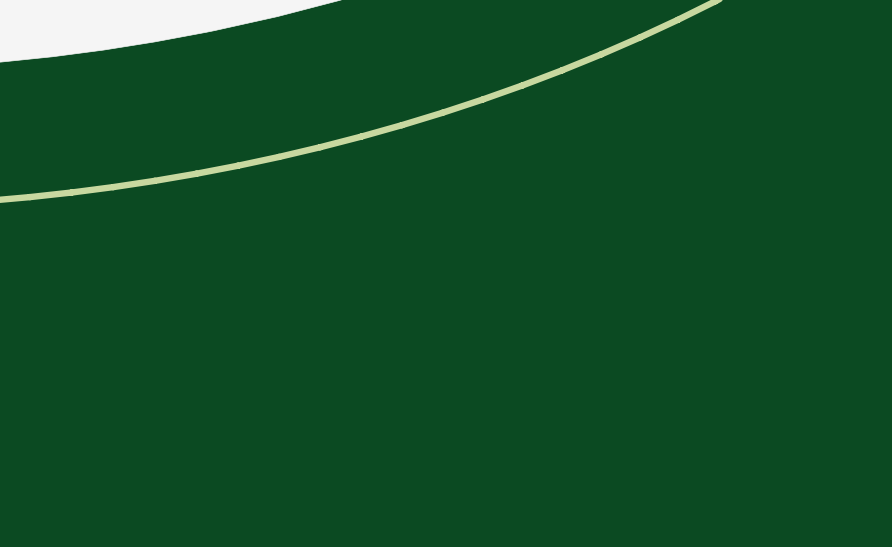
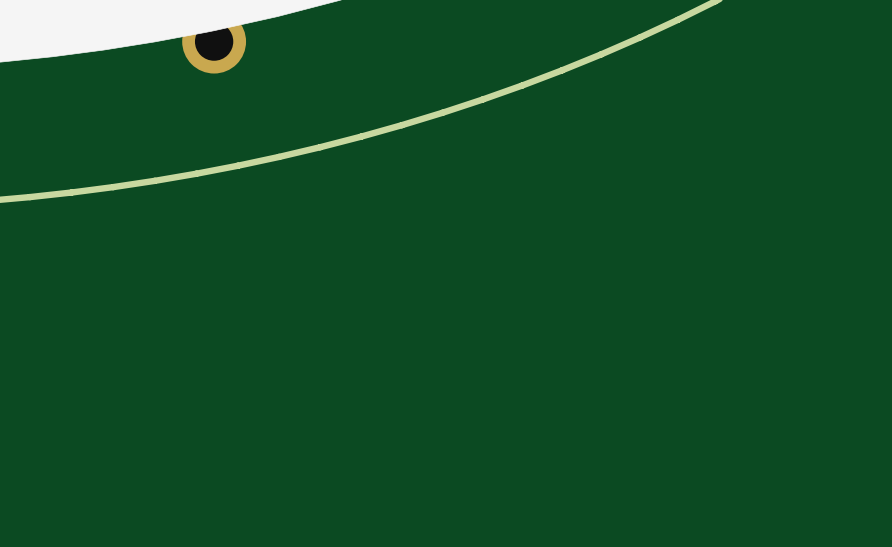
via: none -> (214, 41)

